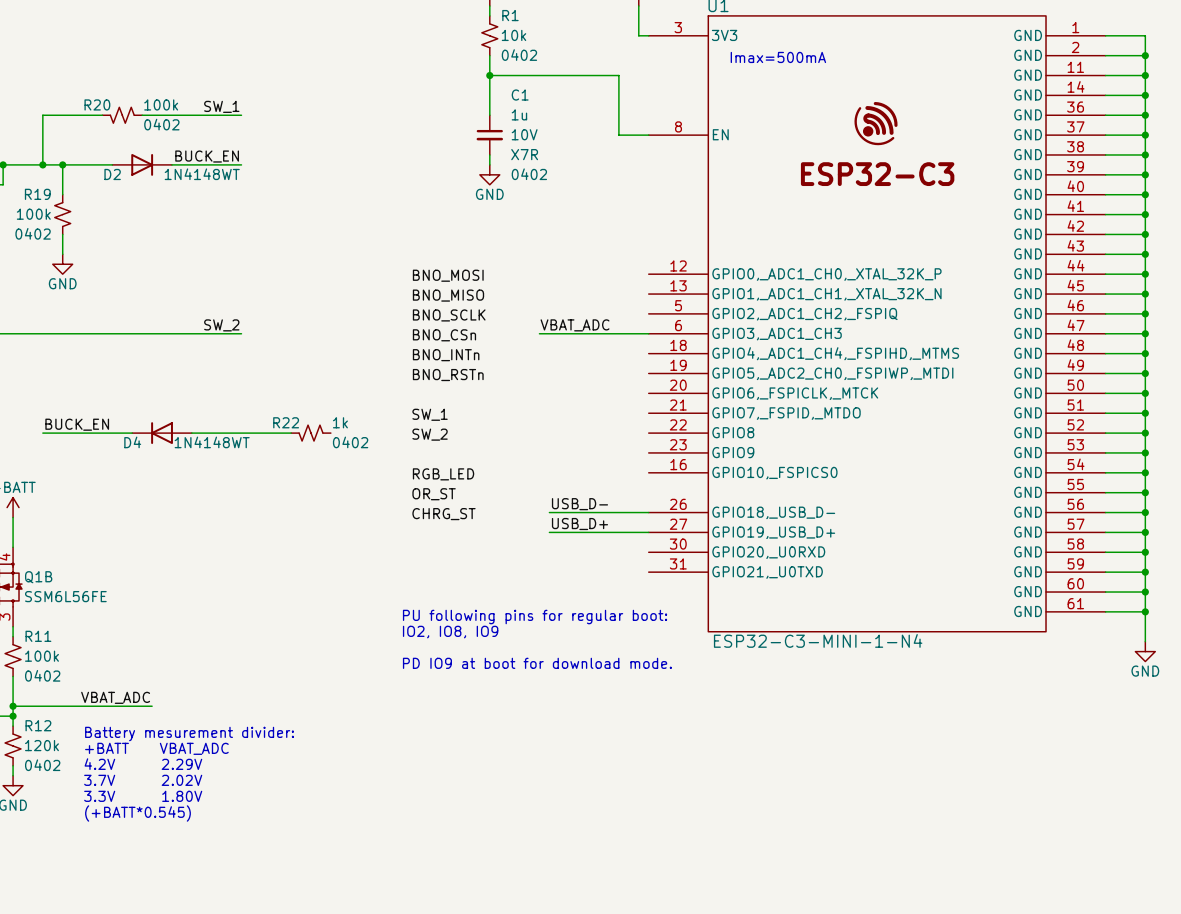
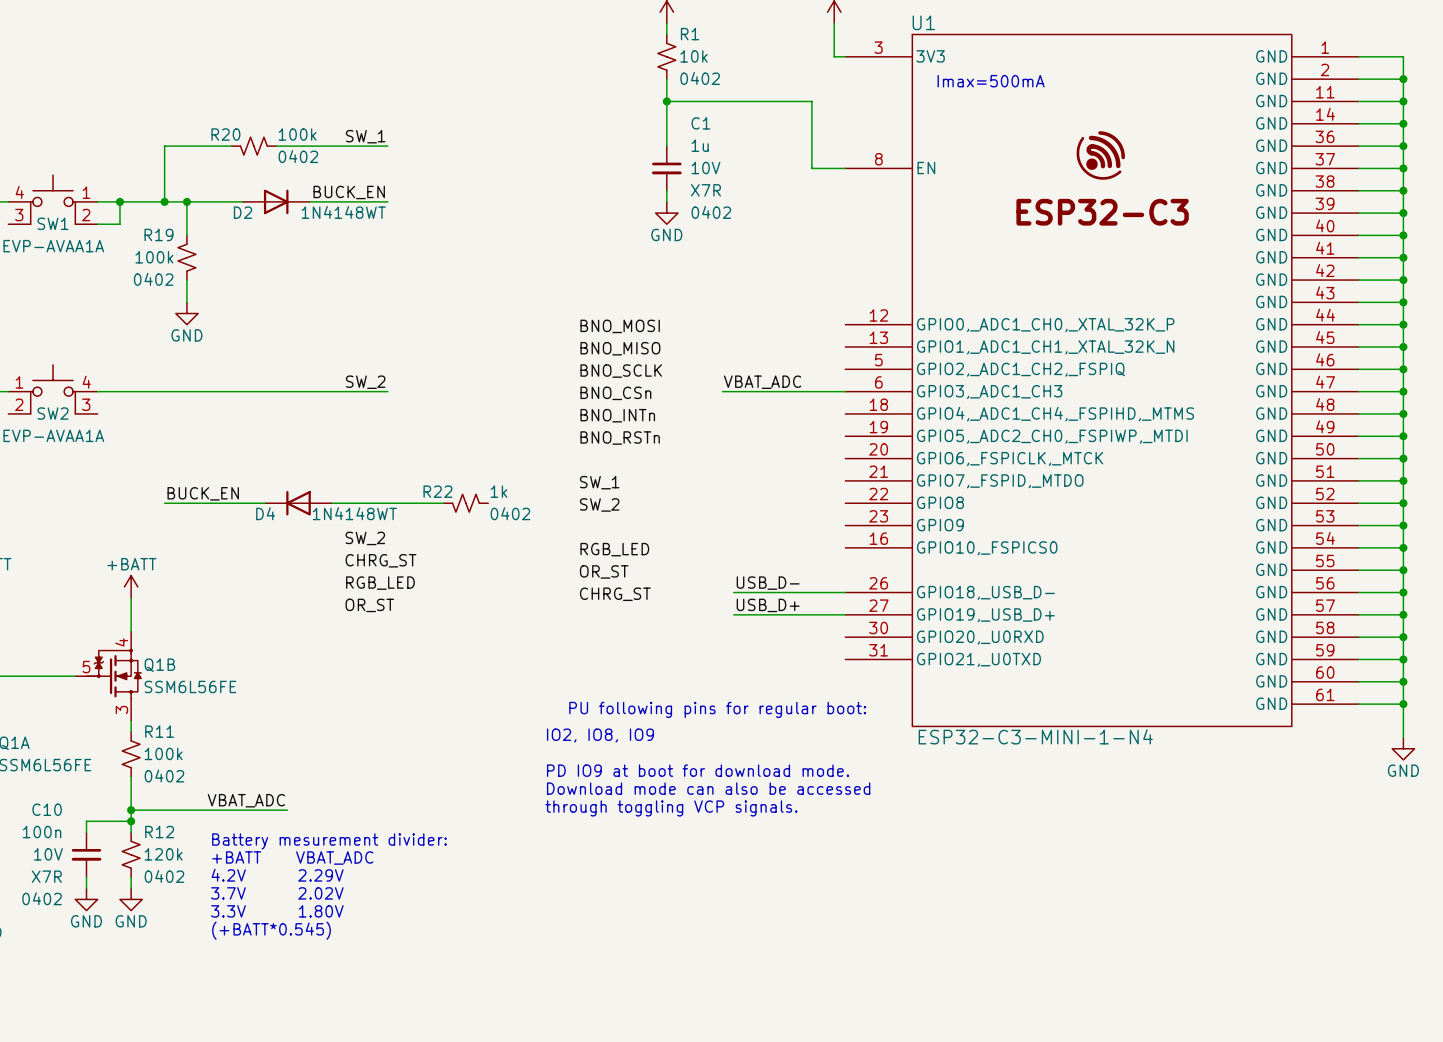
label: none -> SW_2 (365, 538)
label: none -> CHRG_ST (380, 560)
label: none -> RGB_LED (380, 583)
label: none -> OR_ST (369, 605)
text position: IO2, IO8, IO9 (450, 632) -> IO2, IO8, IO9 (600, 735)
text position: PD IO9 at boot for download mode. (537, 663) -> PD IO9 at boot for download mode. (698, 770)
text: none -> Download mode can also be accessed (708, 788)
text: none -> through toggling VCP signals. (671, 808)

